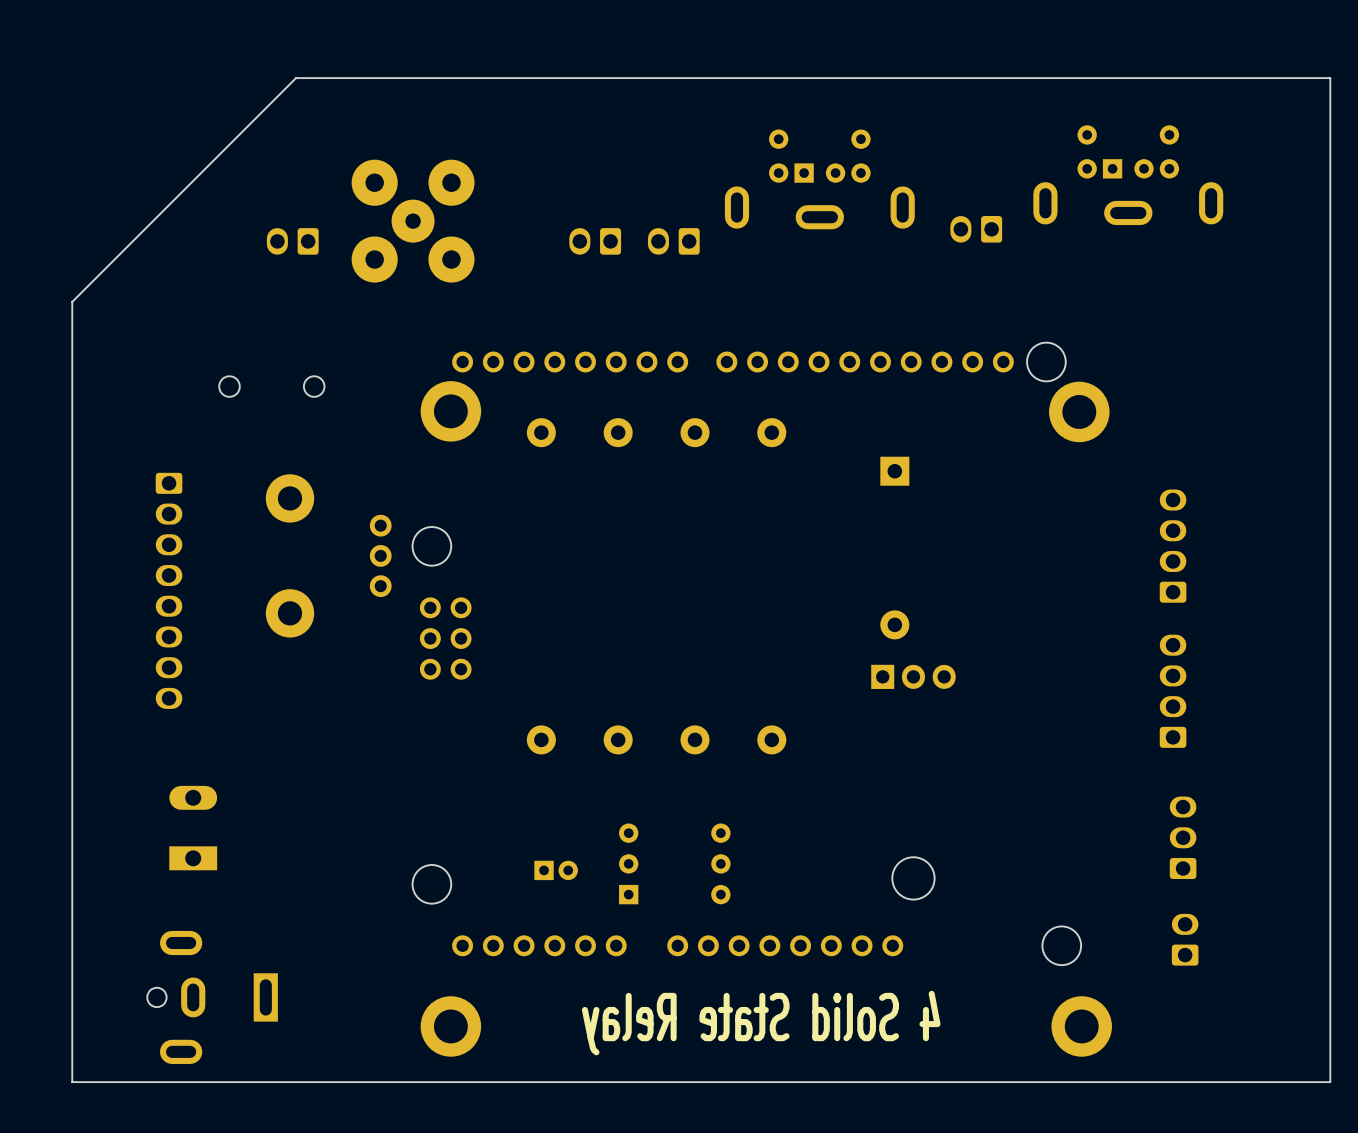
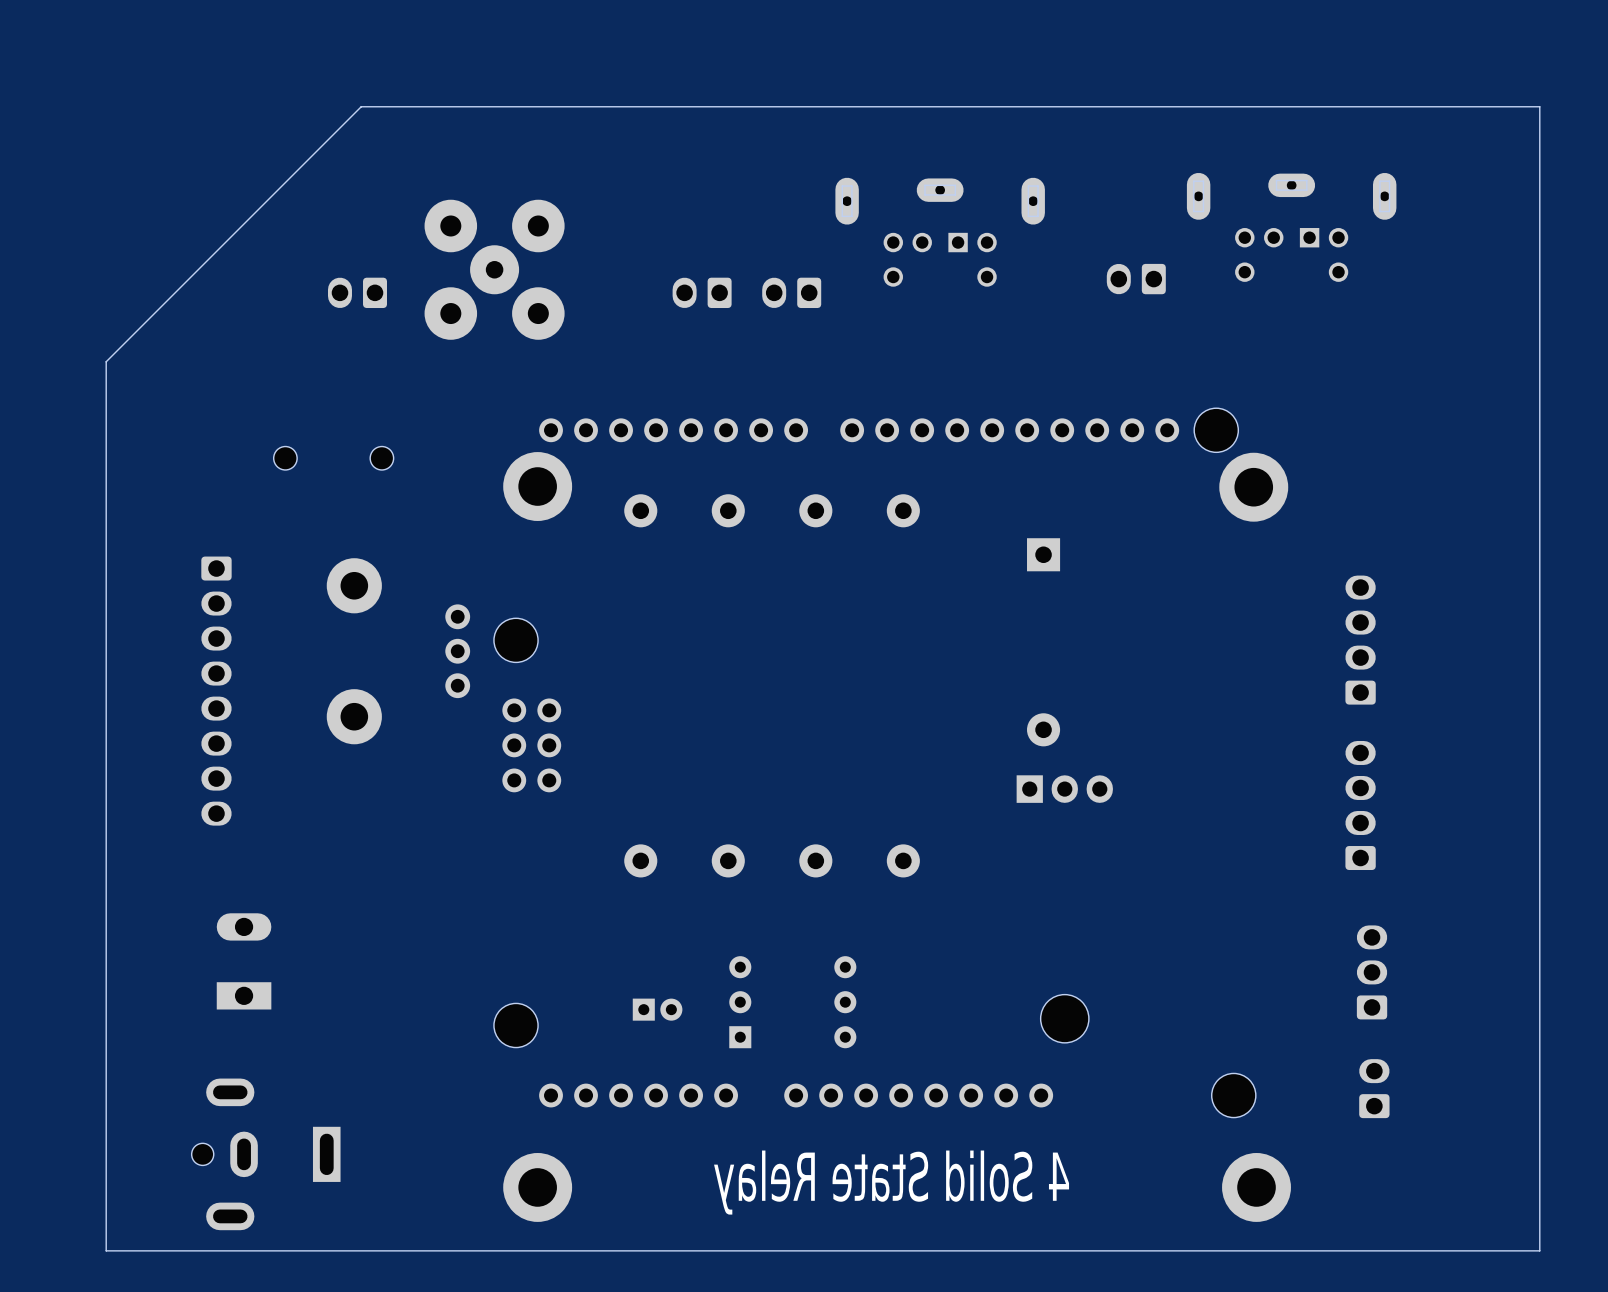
part: (1128, 175) -> none
part: (819, 179) -> none
part: none -> (1291, 227)
part: none -> (940, 232)

